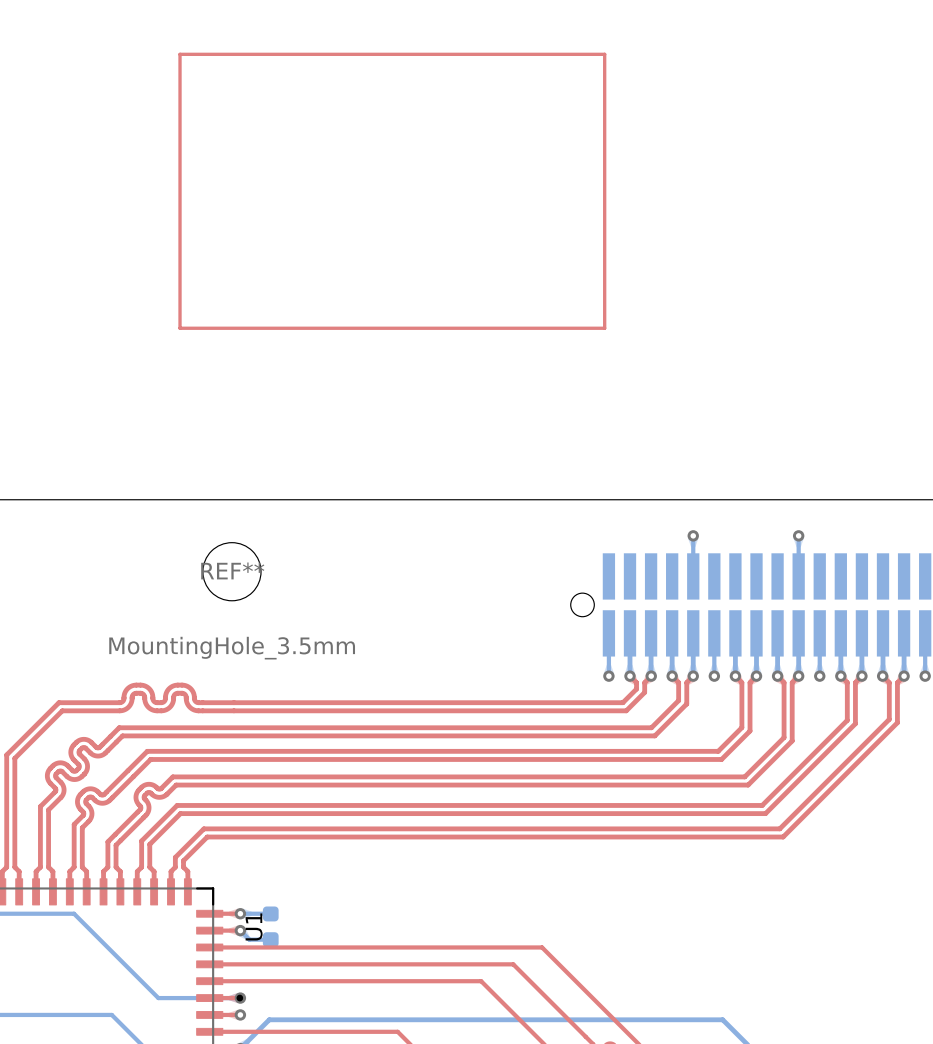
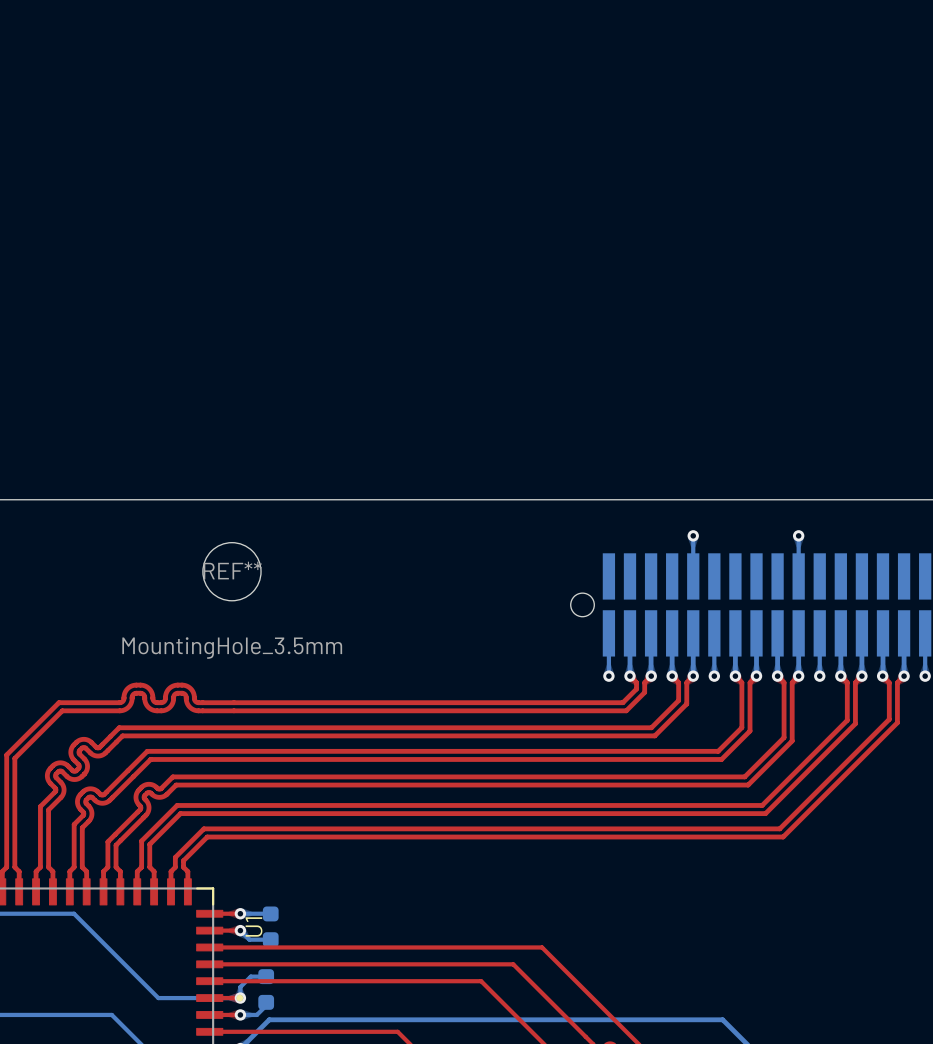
top track: (180, 54) (604, 54) (604, 328) (180, 328) (180, 54) -> none
bottom track: none -> (269, 976) (250, 976) (240, 987) (240, 998)
part: none -> (266, 989)
bottom track: none -> (269, 1002) (256, 1014) (240, 1014)

